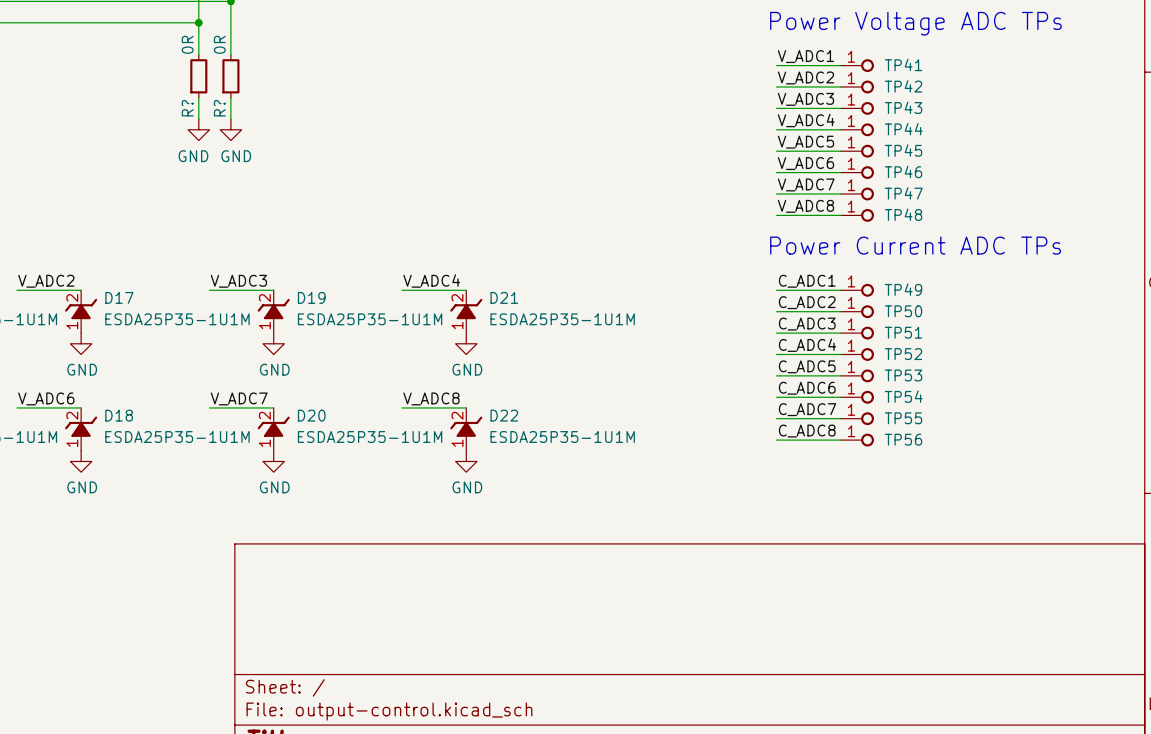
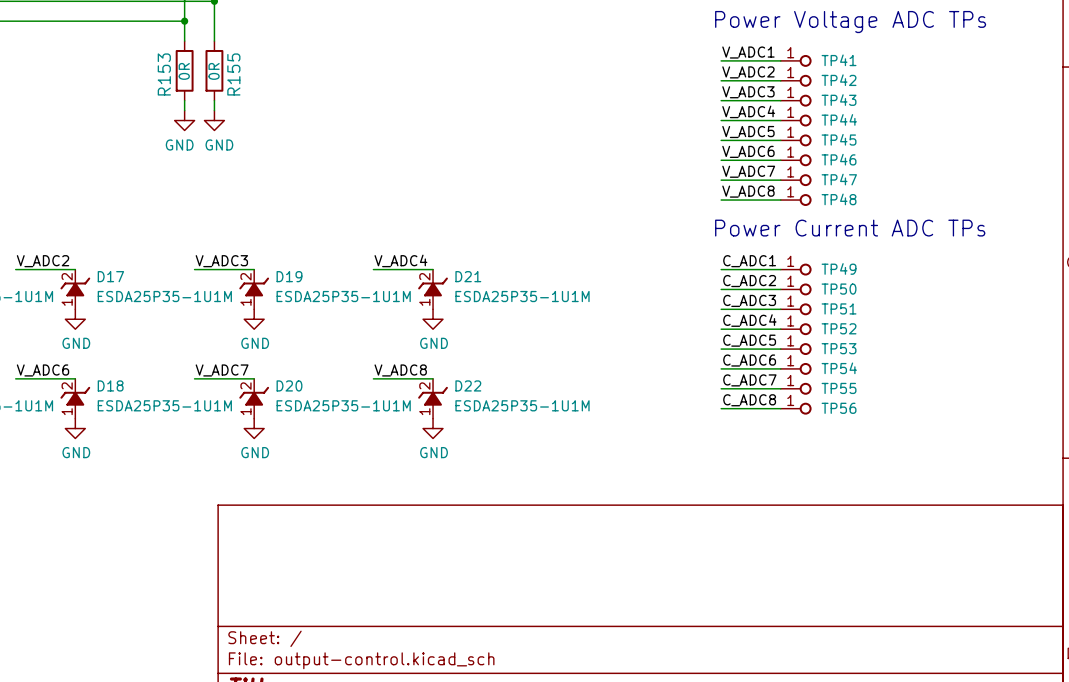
R?: (198, 76) -> none
R153: none -> (184, 70)
R?: (230, 76) -> none
R155: none -> (214, 70)

